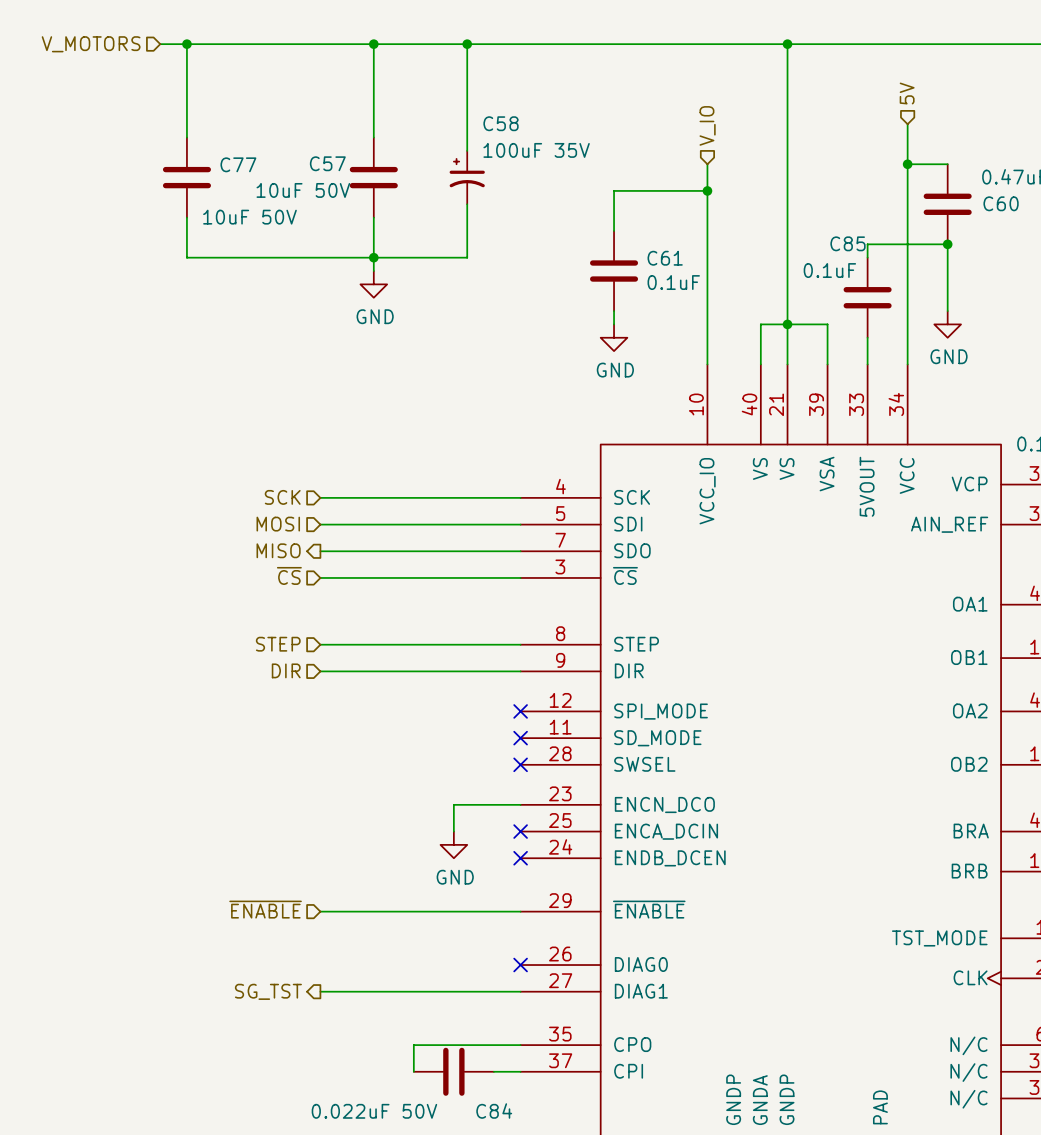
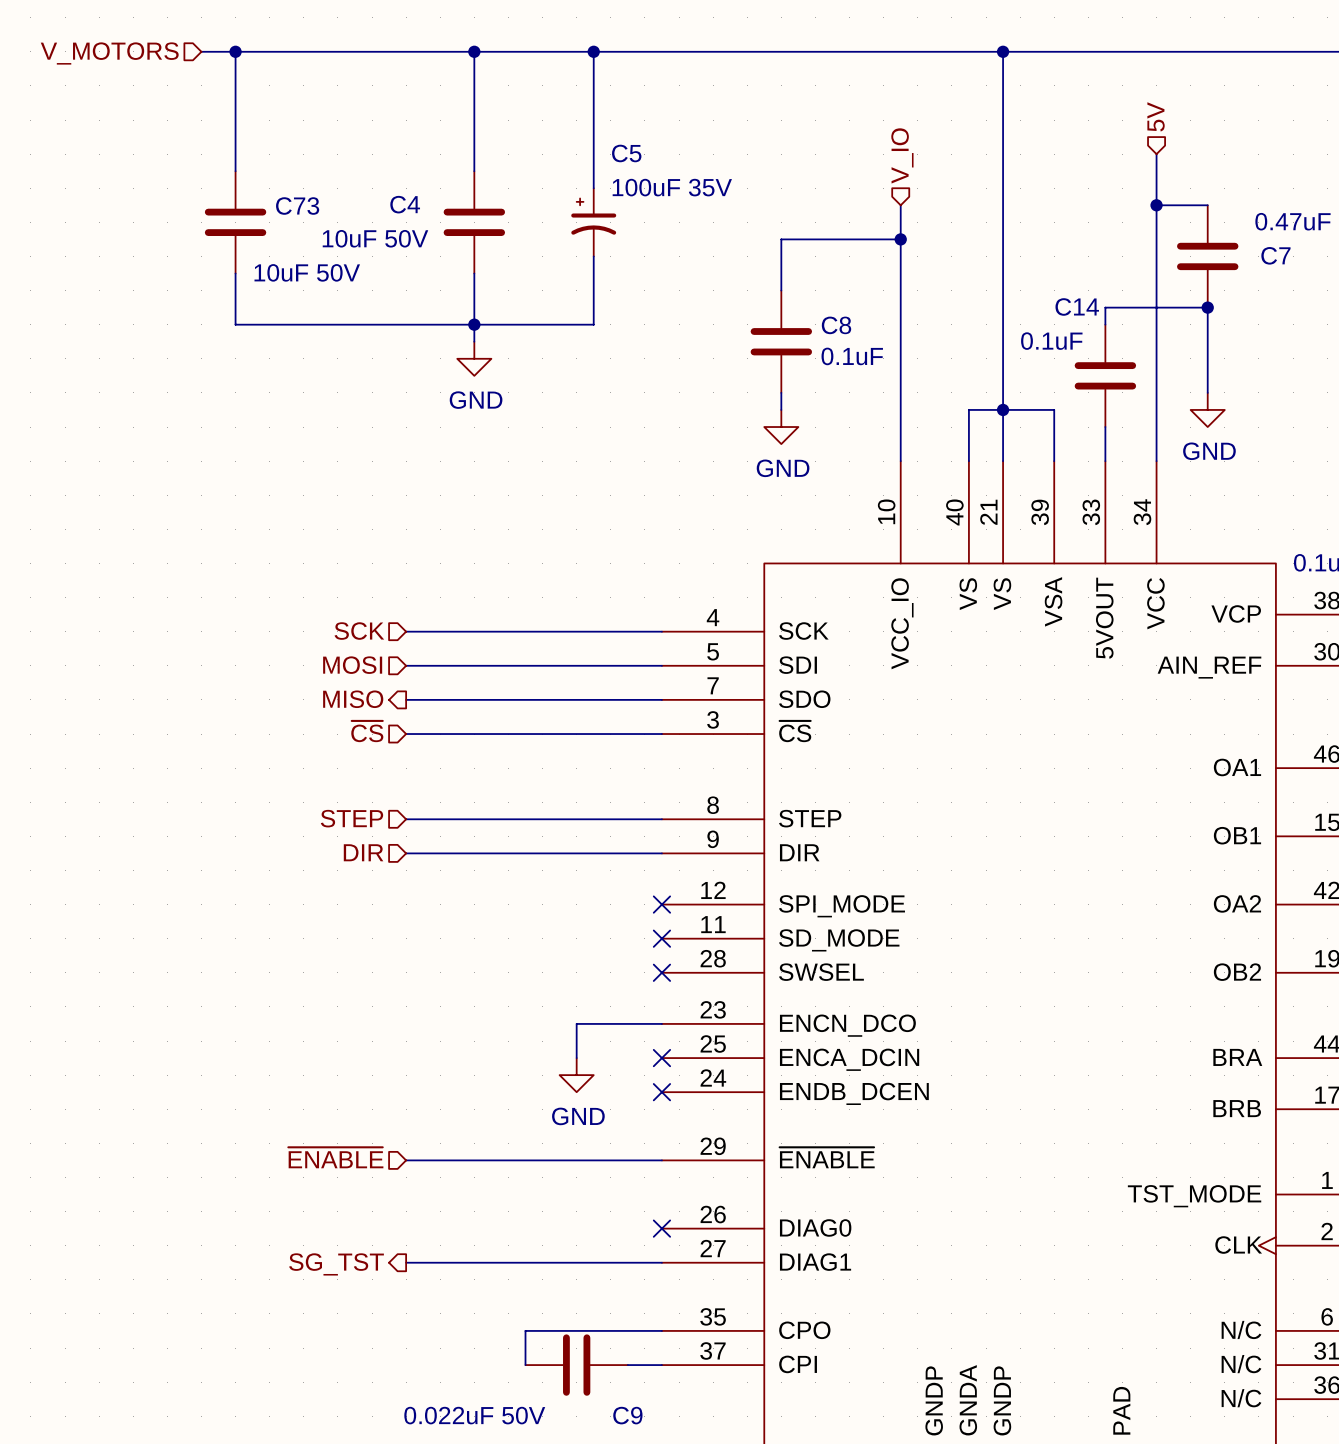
C58 name: C58 (501, 123) -> C5 (626, 153)
C57 name: C57 (327, 163) -> C4 (405, 204)
C77 name: C77 (238, 164) -> C73 (297, 206)
C60 name: C60 (1001, 203) -> C7 (1275, 255)
C85 name: C85 (848, 243) -> C14 (1077, 306)
C61 name: C61 (665, 258) -> C8 (836, 325)
C84 name: C84 (494, 1111) -> C9 (627, 1415)

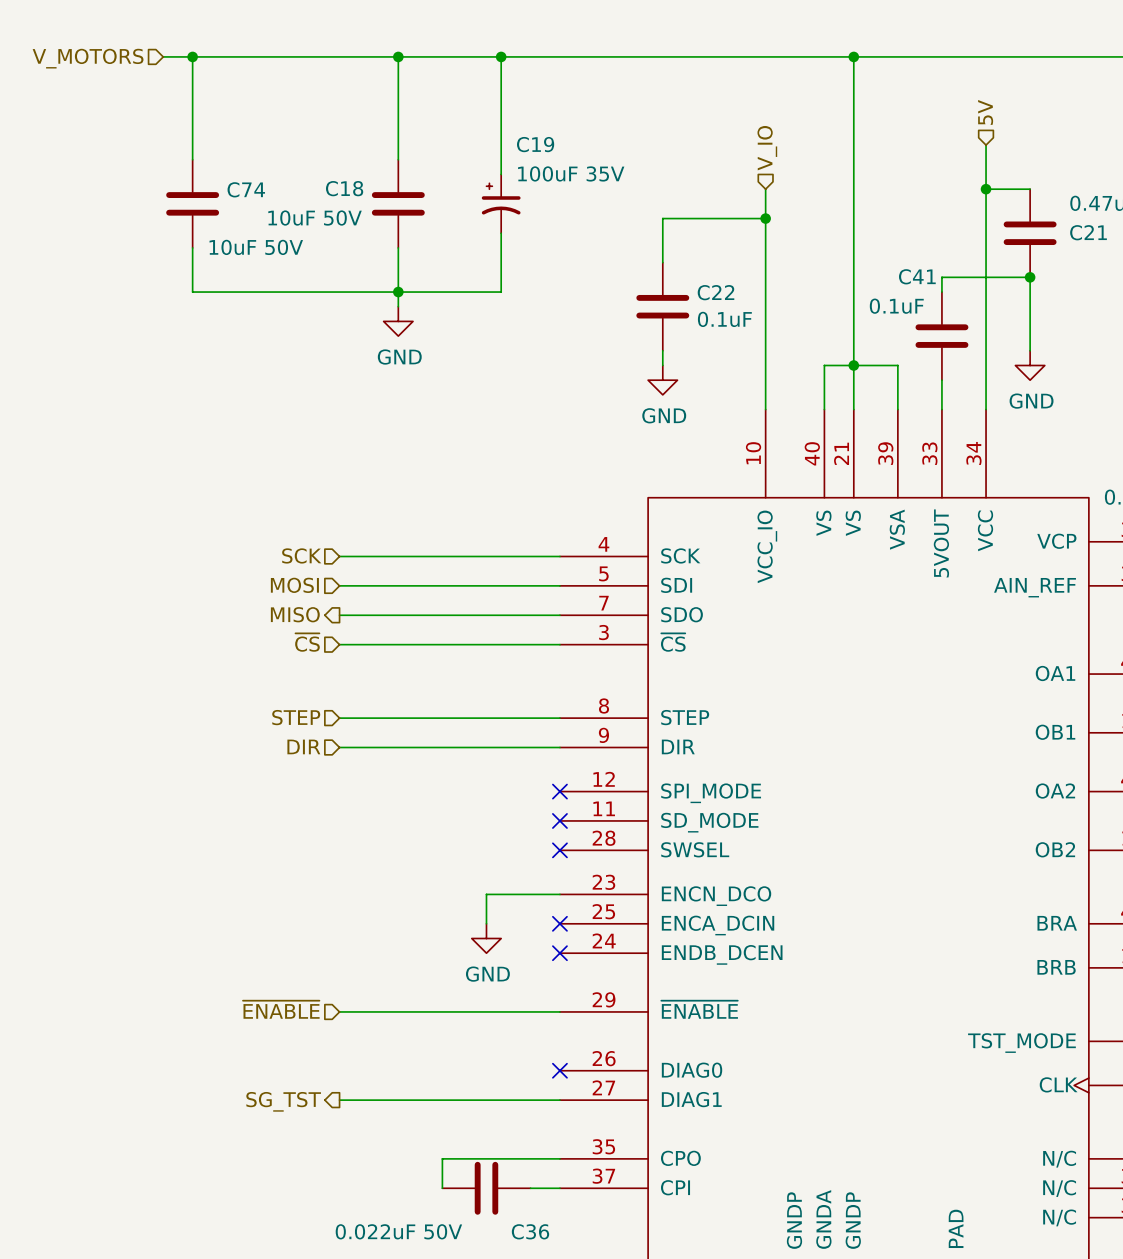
C5 name: C5 (626, 153) -> C19 (535, 144)
C4 name: C4 (405, 204) -> C18 (344, 188)
C73 name: C73 (297, 206) -> C74 (246, 189)
C7 name: C7 (1275, 255) -> C21 (1088, 232)
C14 name: C14 (1077, 306) -> C41 (917, 276)
C8 name: C8 (836, 325) -> C22 (716, 292)
C9 name: C9 (627, 1415) -> C36 (530, 1231)

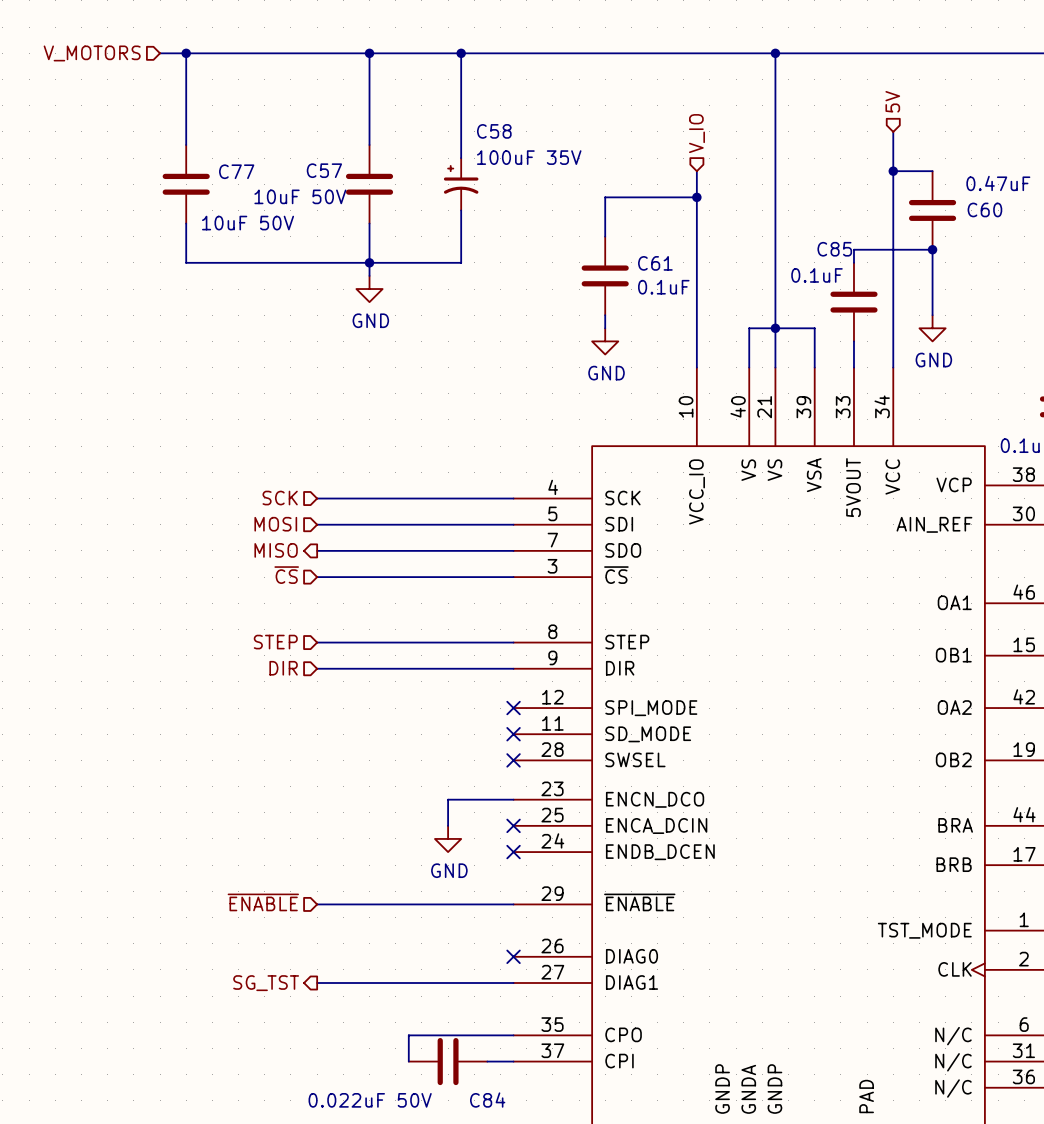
C19 name: C19 (535, 144) -> C58 (494, 131)
C18 name: C18 (344, 188) -> C57 (324, 170)
C74 name: C74 (246, 189) -> C77 (236, 171)
C21 name: C21 (1088, 232) -> C60 (984, 209)
C41 name: C41 (917, 276) -> C85 (834, 249)
C22 name: C22 (716, 292) -> C61 (655, 263)
C36 name: C36 (530, 1231) -> C84 (487, 1100)

